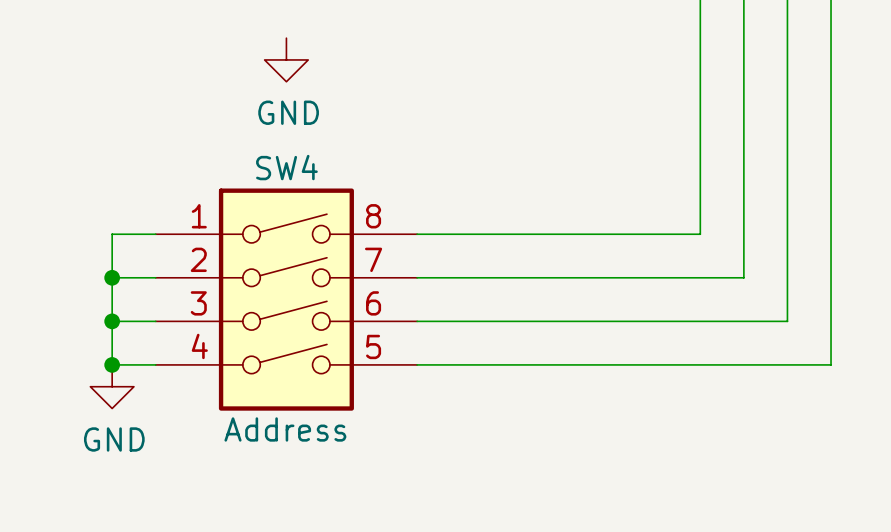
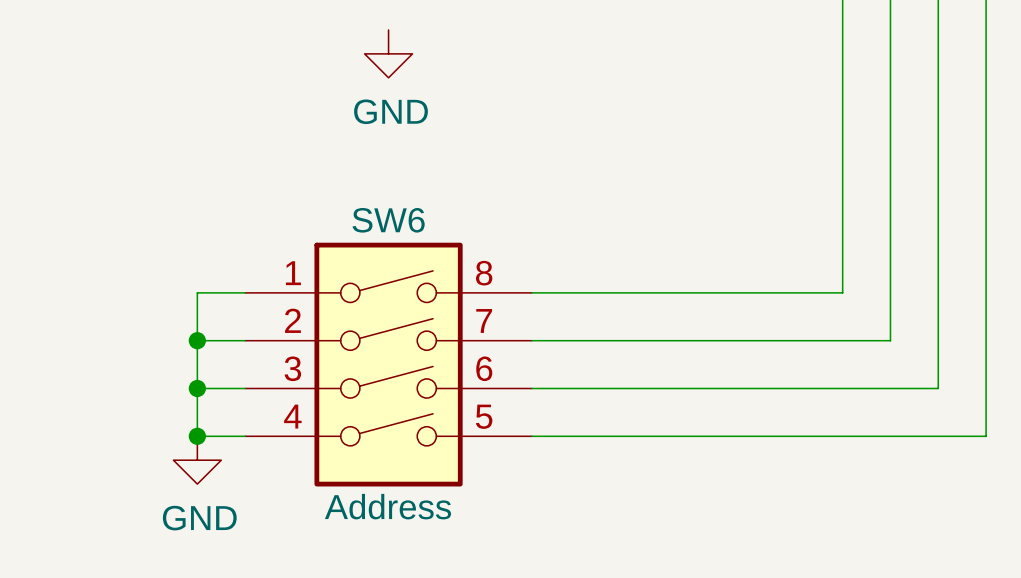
wire: (155, 234) (112, 234) (112, 277) -> none
wire: (417, 234) (700, 234) -> none
junction: (112, 277) -> none
wire: (700, 277) (743, 277) -> (842, 292) (842, 245)
SW4: Address (286, 299) -> none
wire: (743, 321) (787, 321) -> (890, 340) (890, 292)
SW6: none -> Address (388, 364)
wire: none -> (197, 388) (197, 436) (245, 436)
wire: (787, 364) (831, 364) -> (938, 388) (938, 340)
wire: none -> (986, 388) (986, 436) (531, 436)
power symbol position: GND (112, 386) -> GND (197, 460)
junction: none -> (197, 436)

